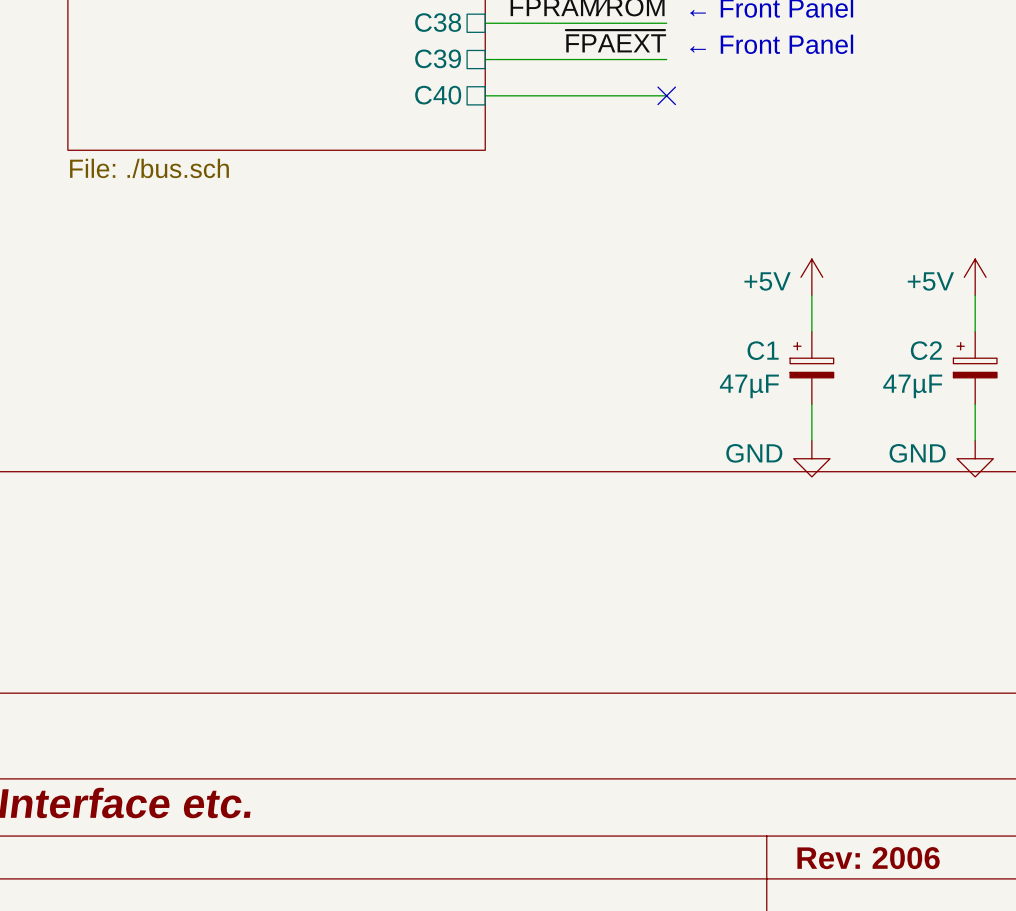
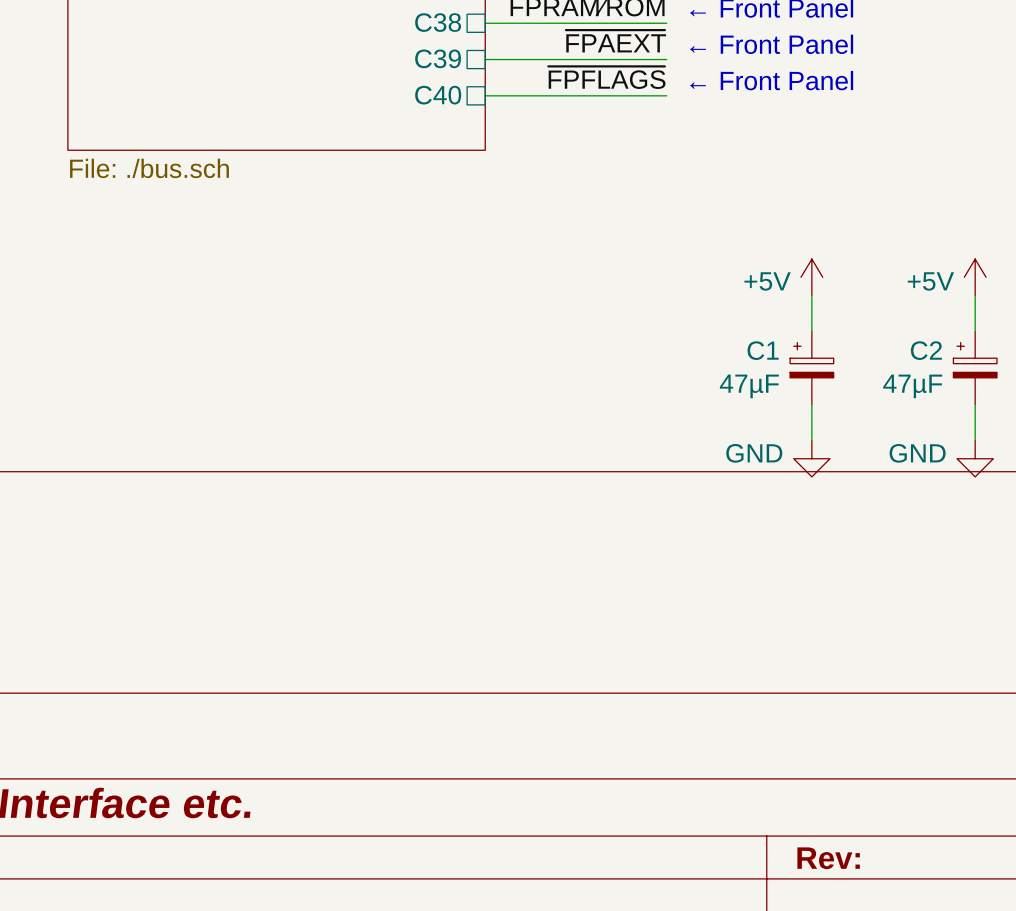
label: none -> ~{FPFLAGS} (606, 77)
text: none -> ← Front Panel (771, 80)
no-connect mark: (666, 95) -> none
title block: Rev: 2006 (868, 858) -> Rev: (828, 858)

